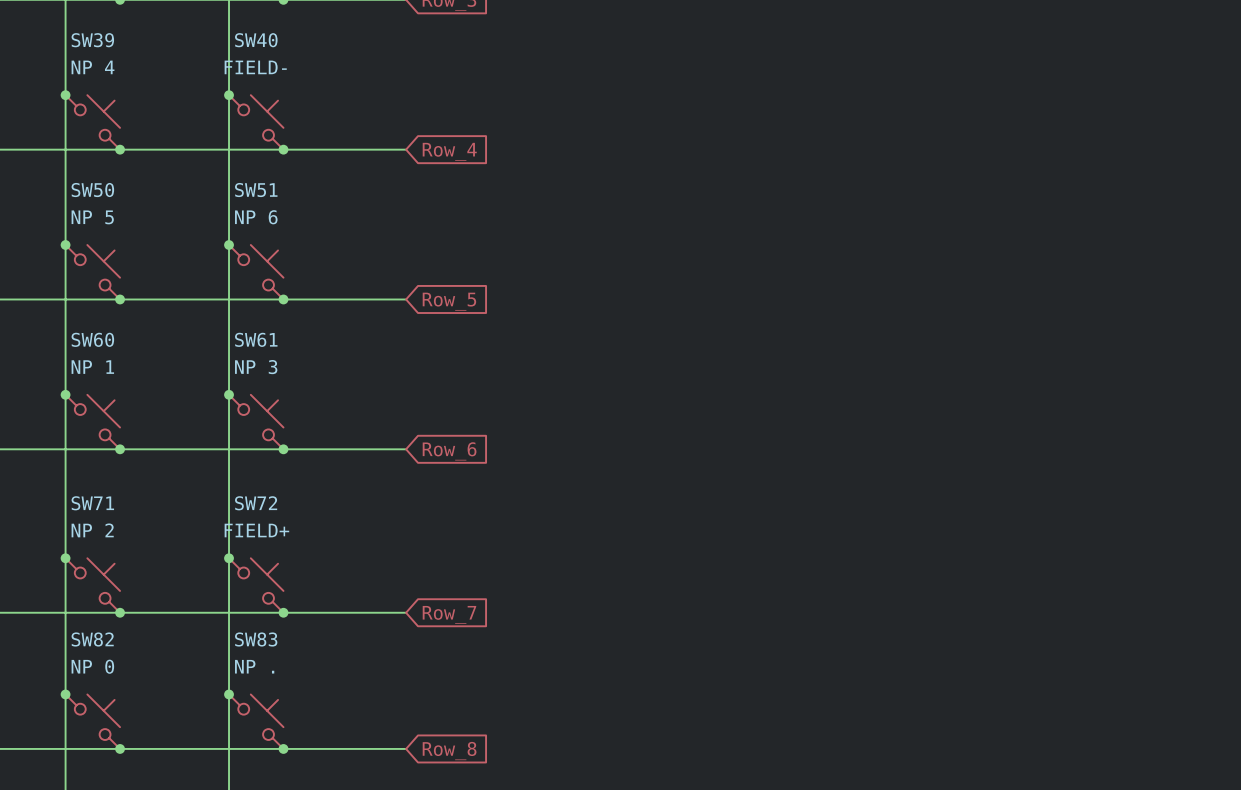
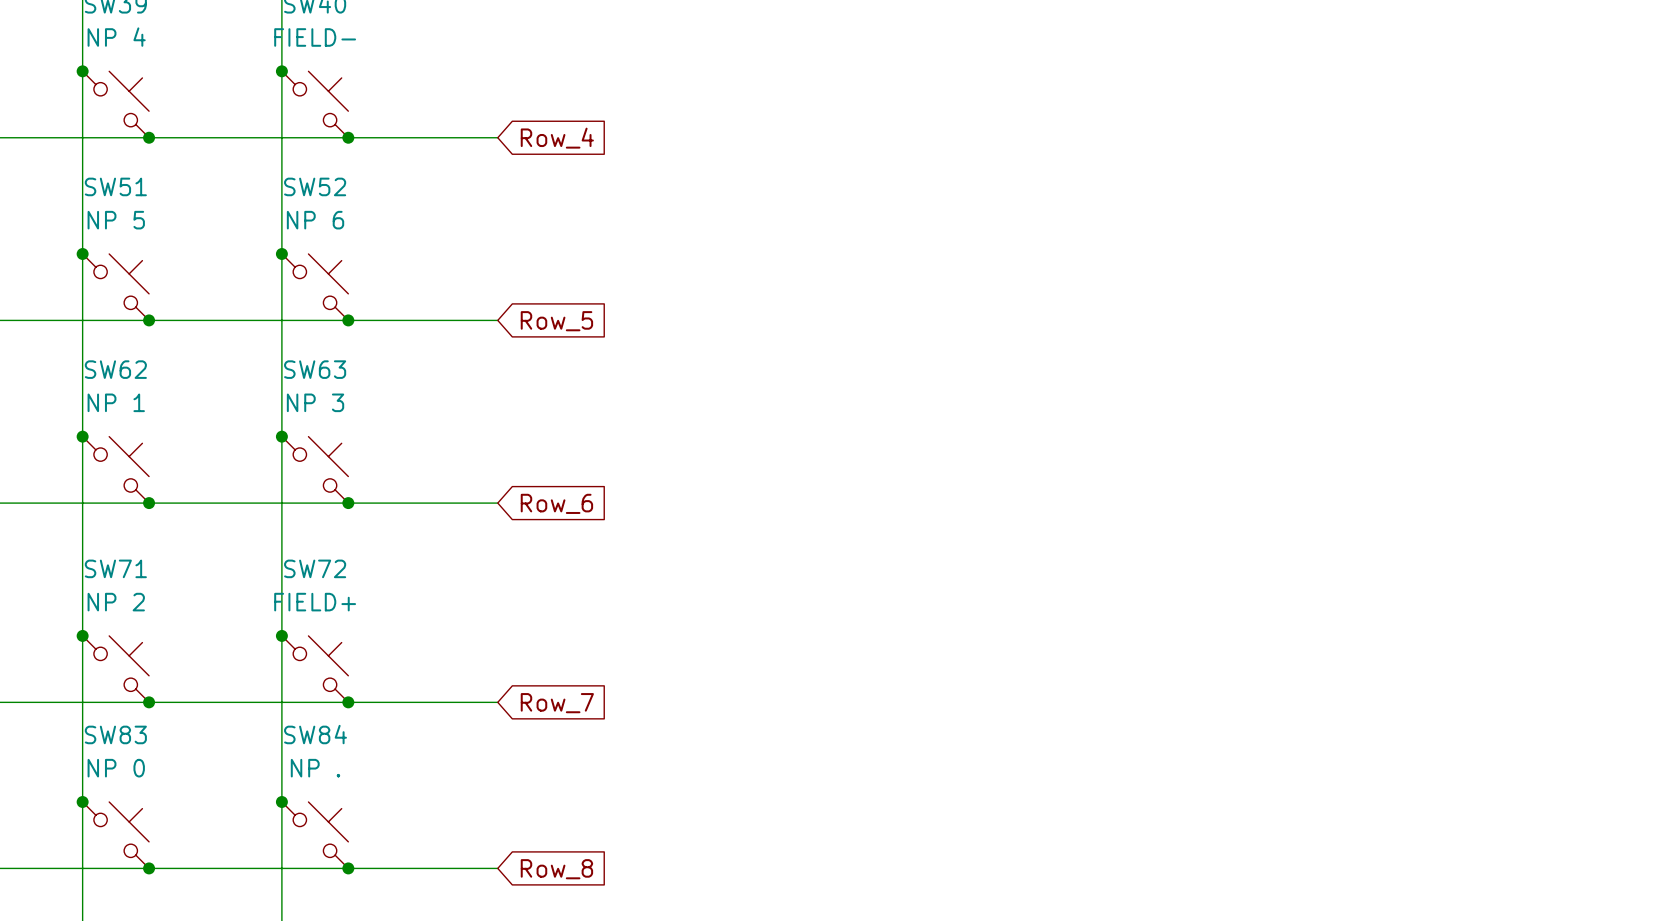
SW50 name: SW50 (92, 190) -> SW51 (115, 186)
SW51 name: SW51 (256, 190) -> SW52 (315, 186)
SW60 name: SW60 (92, 339) -> SW62 (115, 369)
SW61 name: SW61 (256, 339) -> SW63 (315, 369)
SW82 name: SW82 (92, 639) -> SW83 (115, 734)
SW83 name: SW83 (256, 639) -> SW84 (315, 734)

